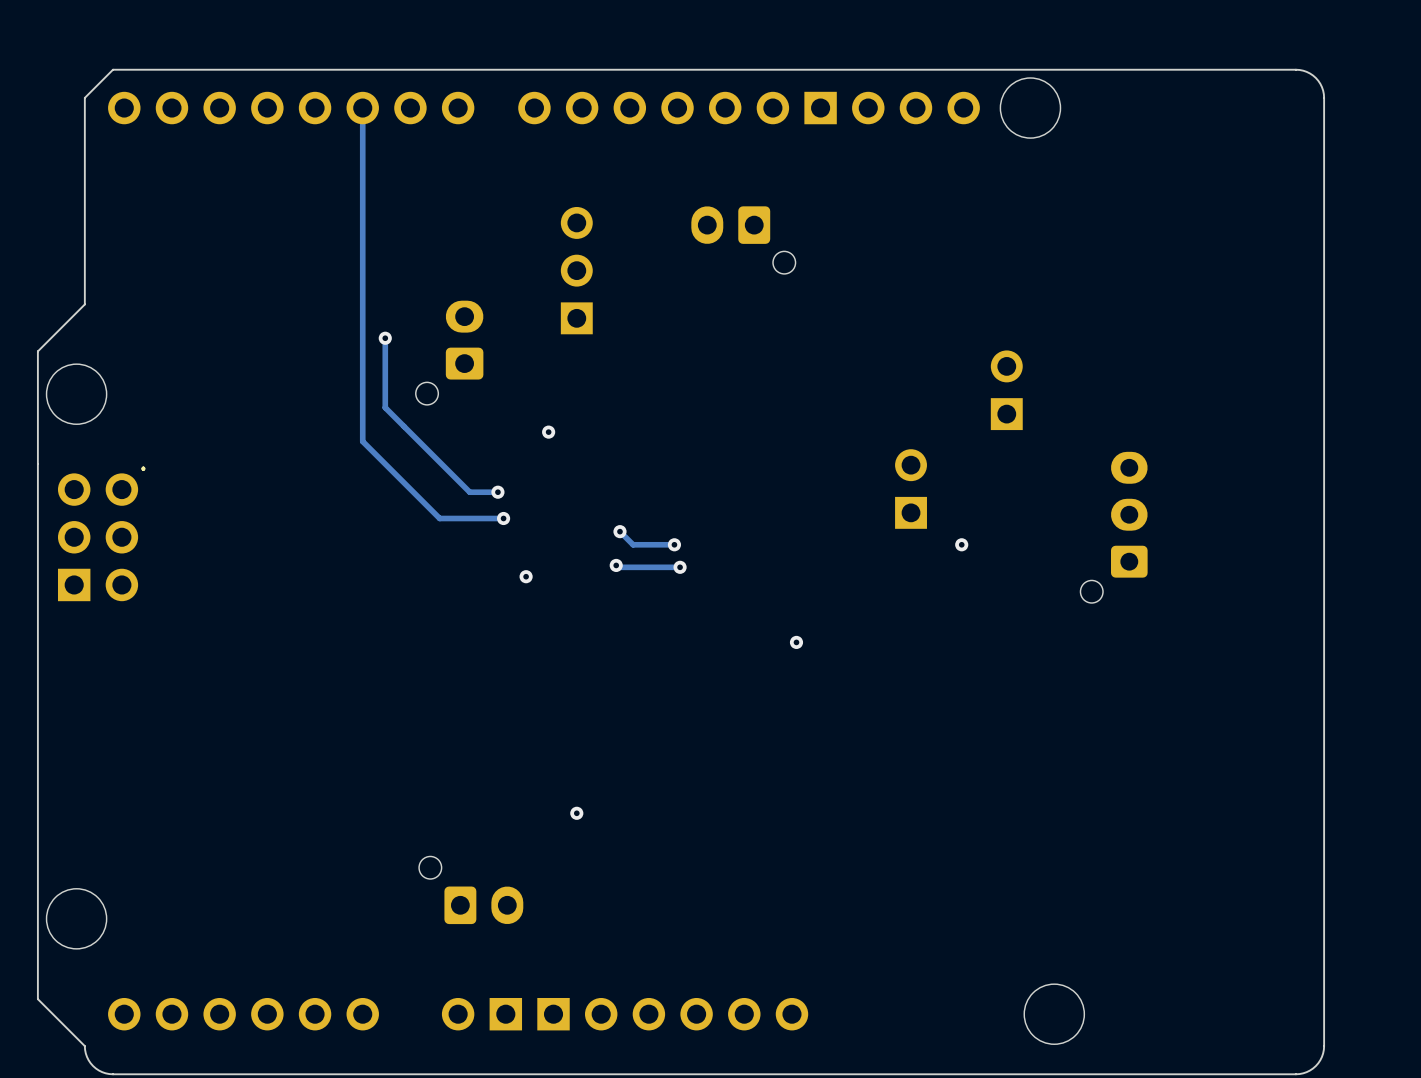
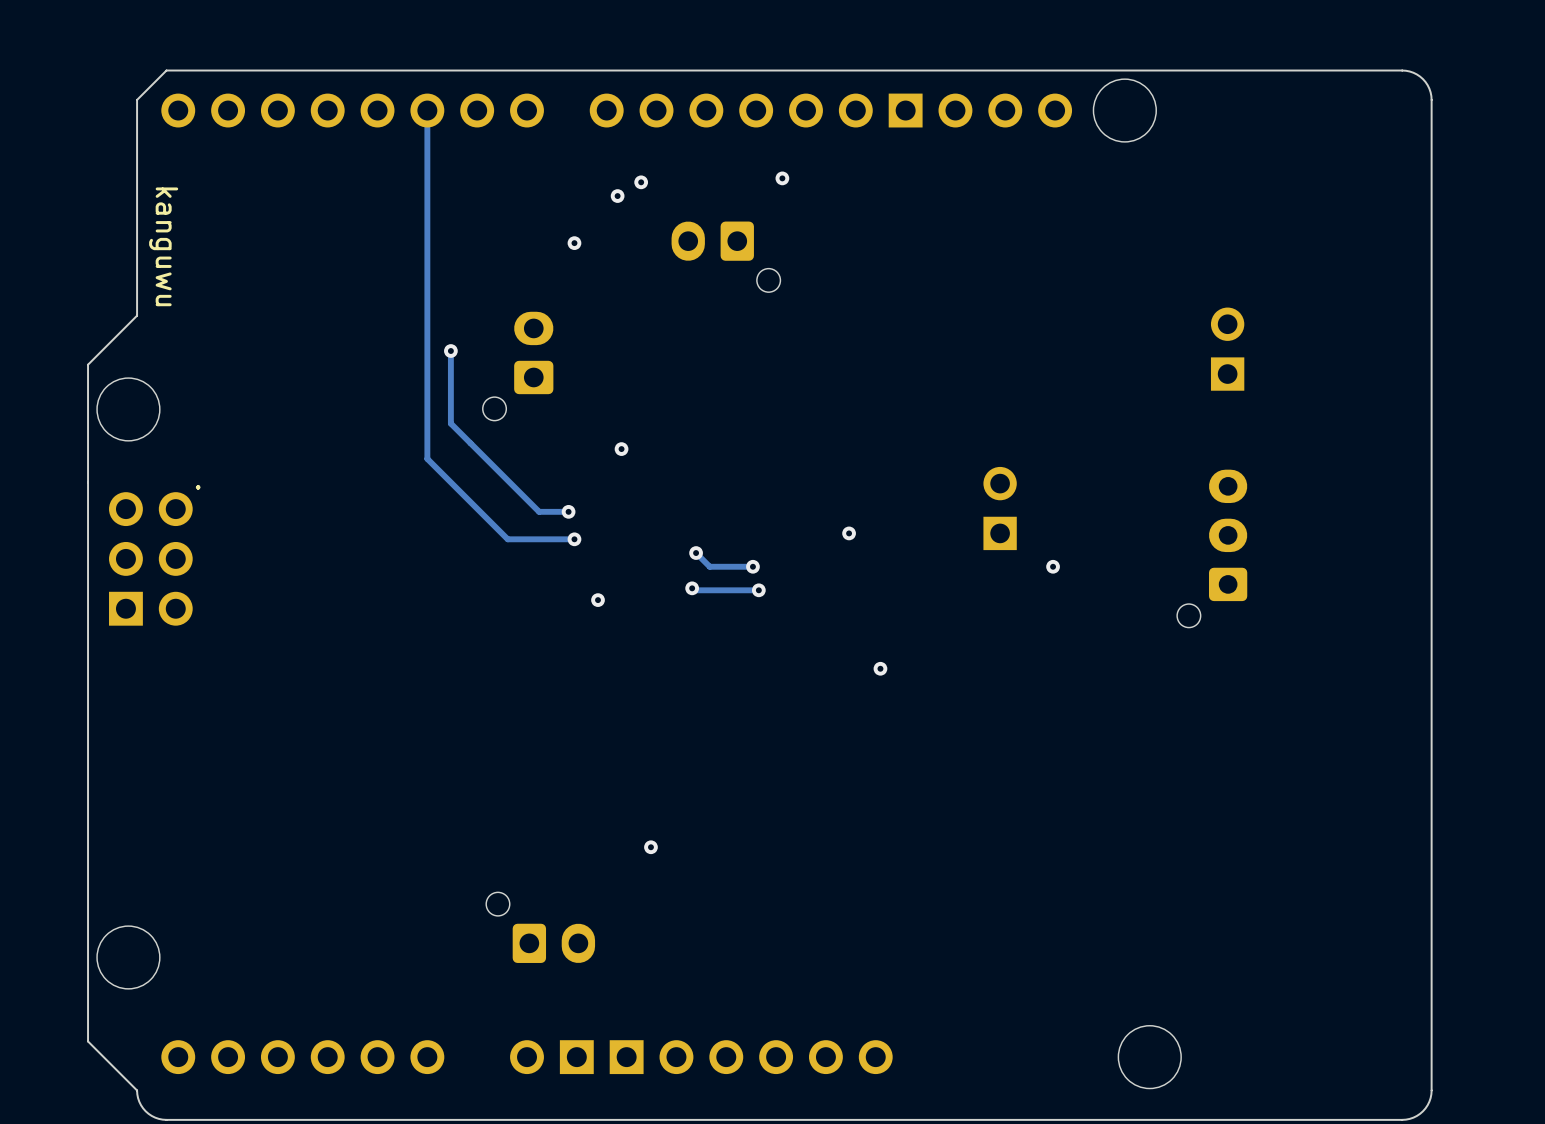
via: none -> (782, 178)
via: none -> (641, 182)
via: none -> (617, 196)
via: none -> (574, 243)
text: none -> kanguwu (163, 246)
part position: (743, 240) -> (725, 256)
part: (576, 270) -> none
part position: (1006, 390) -> (1227, 349)
via: none -> (849, 533)

